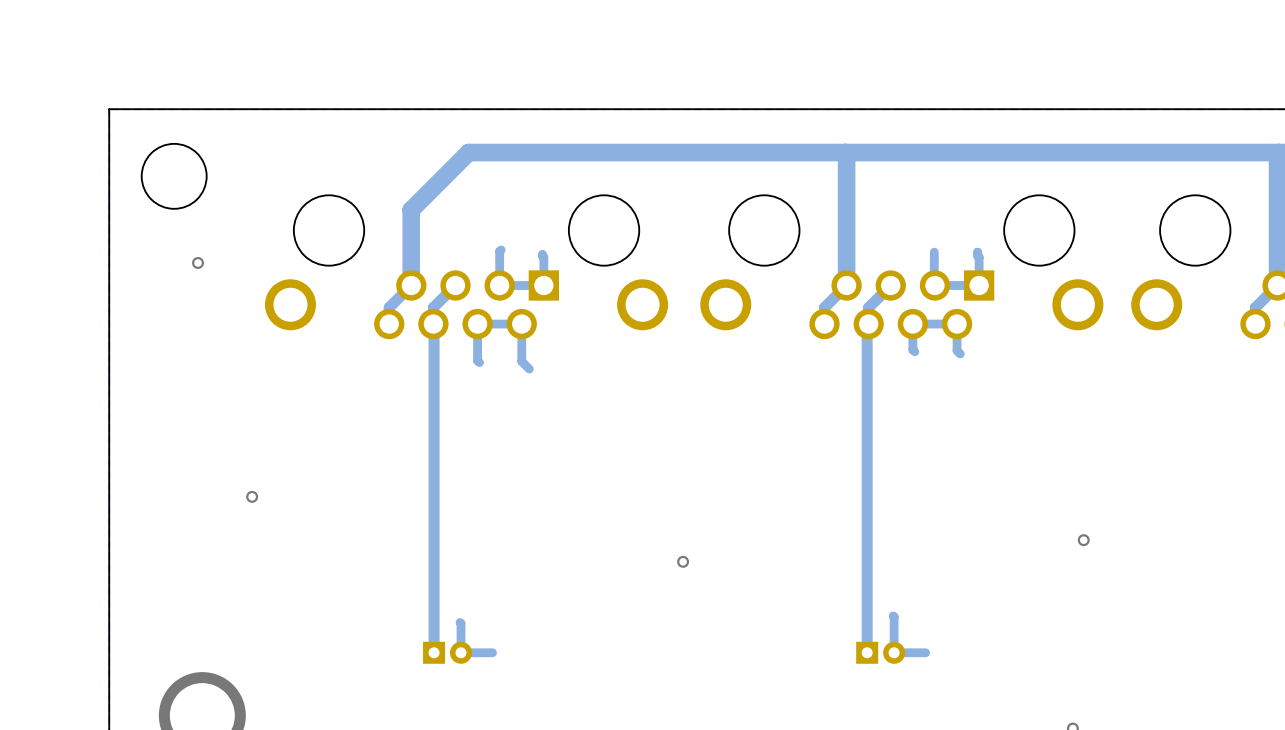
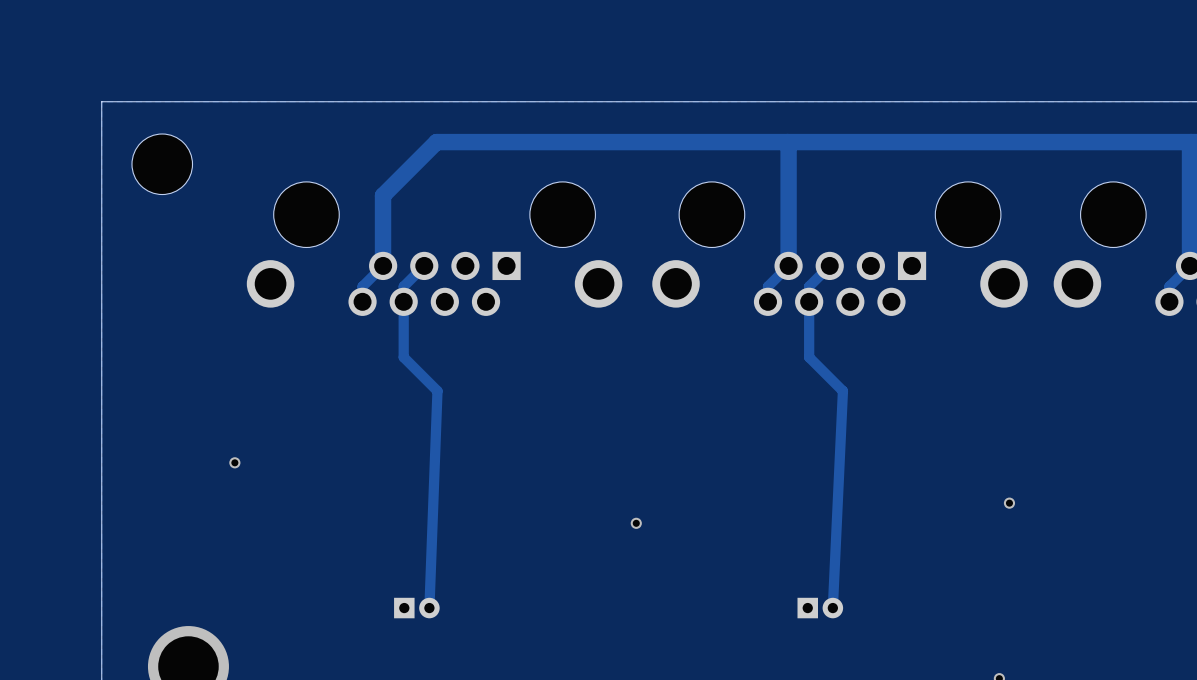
track: (501, 249) (499, 285) (543, 285) (542, 254) -> none
track: (934, 252) (934, 285) (979, 285) (977, 252) -> none
via: (198, 262) -> none
track: (433, 324) (434, 652) -> (403, 301) (403, 357) (437, 391) (429, 608)
track: (868, 324) (867, 325) (867, 652) -> (809, 301) (809, 357) (842, 391) (832, 608)
track: (914, 351) (912, 349) (912, 324) (957, 324) (957, 350) (960, 353) -> none
track: (479, 362) (477, 360) (477, 324) (521, 324) (521, 361) (529, 369) -> none
track: (893, 615) (894, 652) (925, 652) -> none
track: (460, 622) (461, 652) (492, 652) -> none

